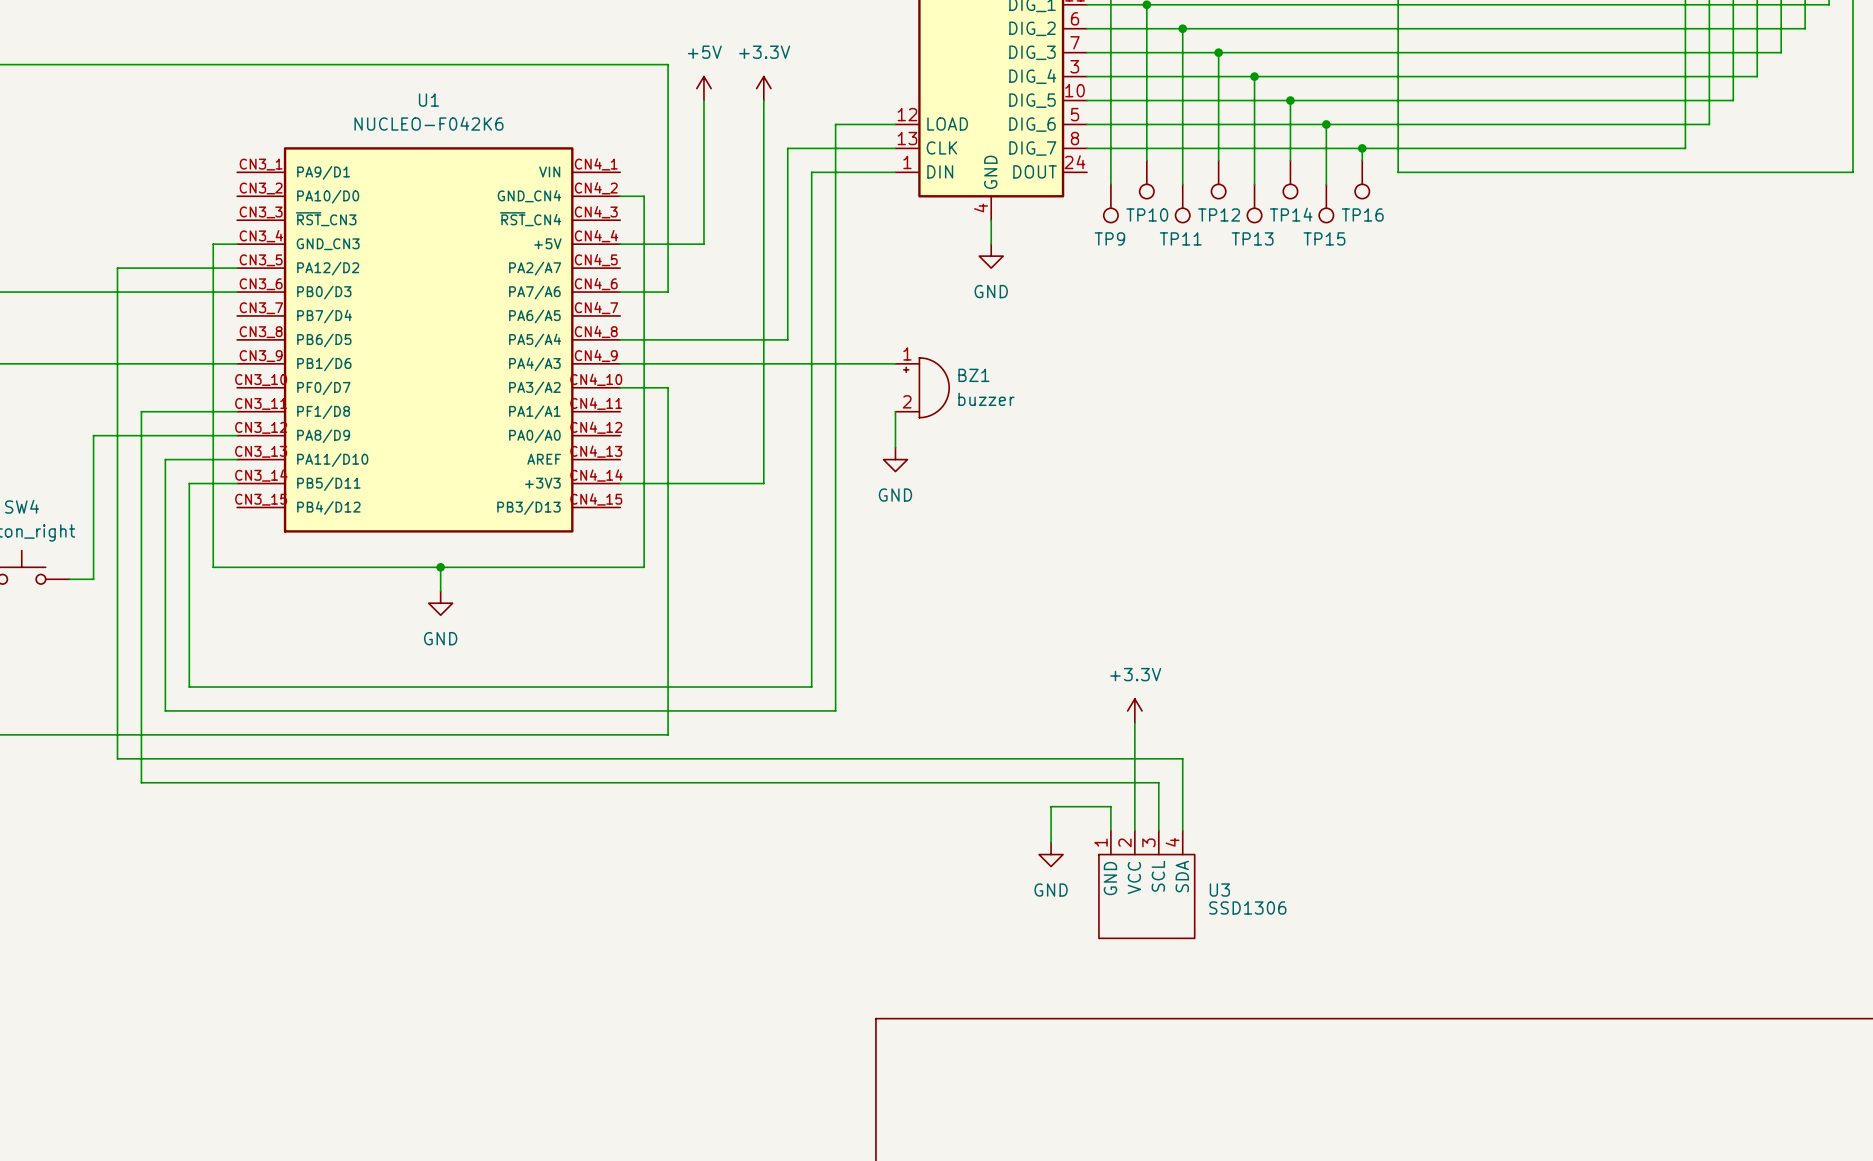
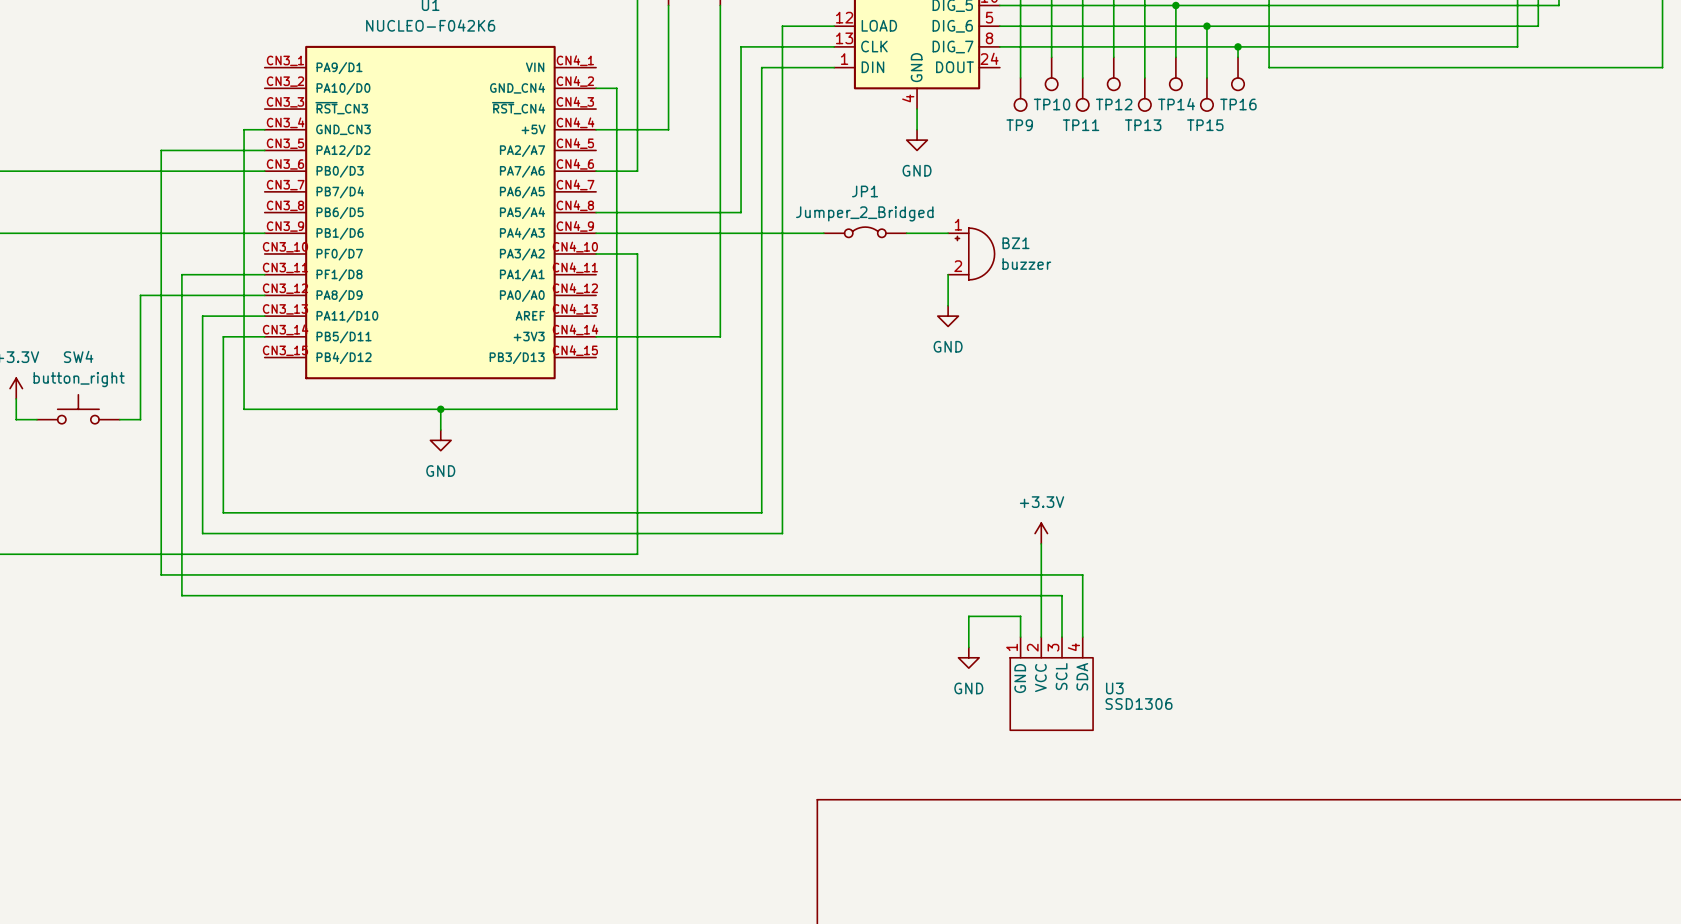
JP1: none -> Jumper_2_Bridged (865, 232)
wire: none -> (906, 233) (948, 233)
BZ1 position: (922, 387) -> (971, 253)
wire: (895, 411) (895, 447) -> (948, 274) (948, 305)
power symbol position: GND (895, 459) -> GND (948, 316)

